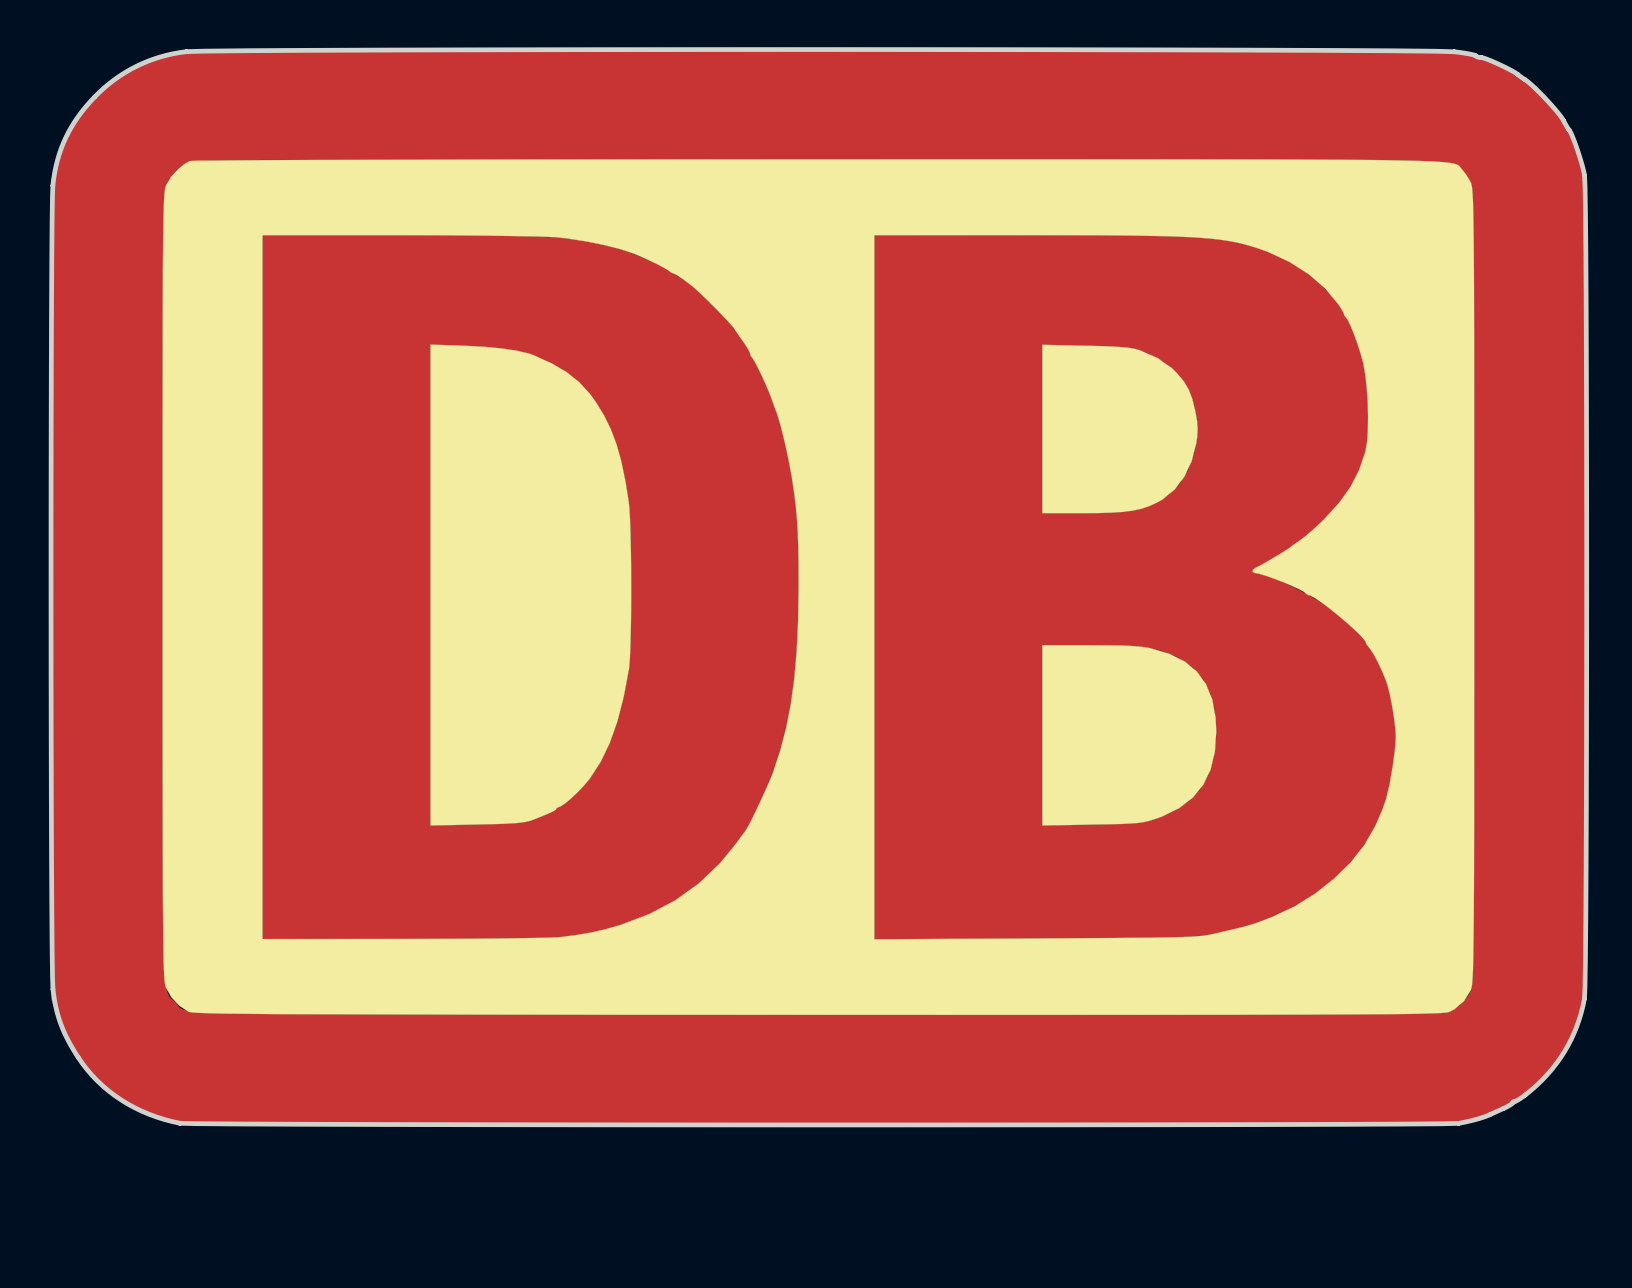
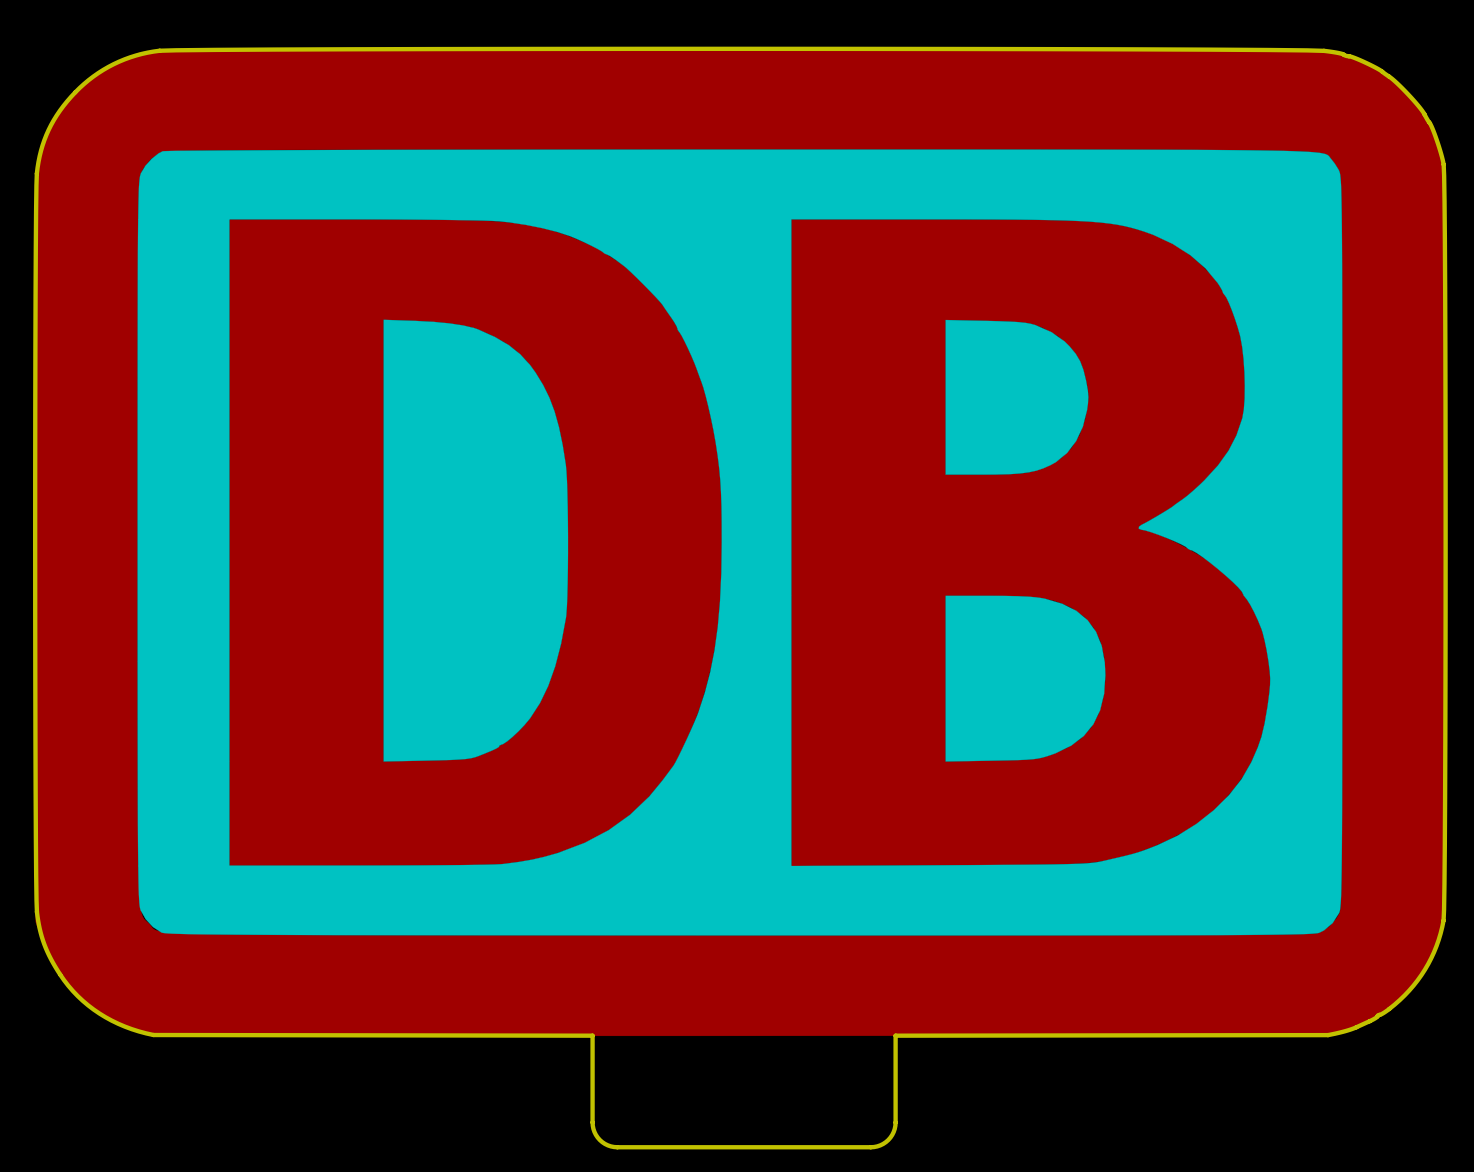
board edge: (179, 1123) (819, 1124) (1458, 1123) -> (153, 1035) (592, 1035) (593, 1128) (602, 1142) (617, 1147) (870, 1147) (880, 1145) (890, 1137) (895, 1125) (895, 1035) (1328, 1035)

